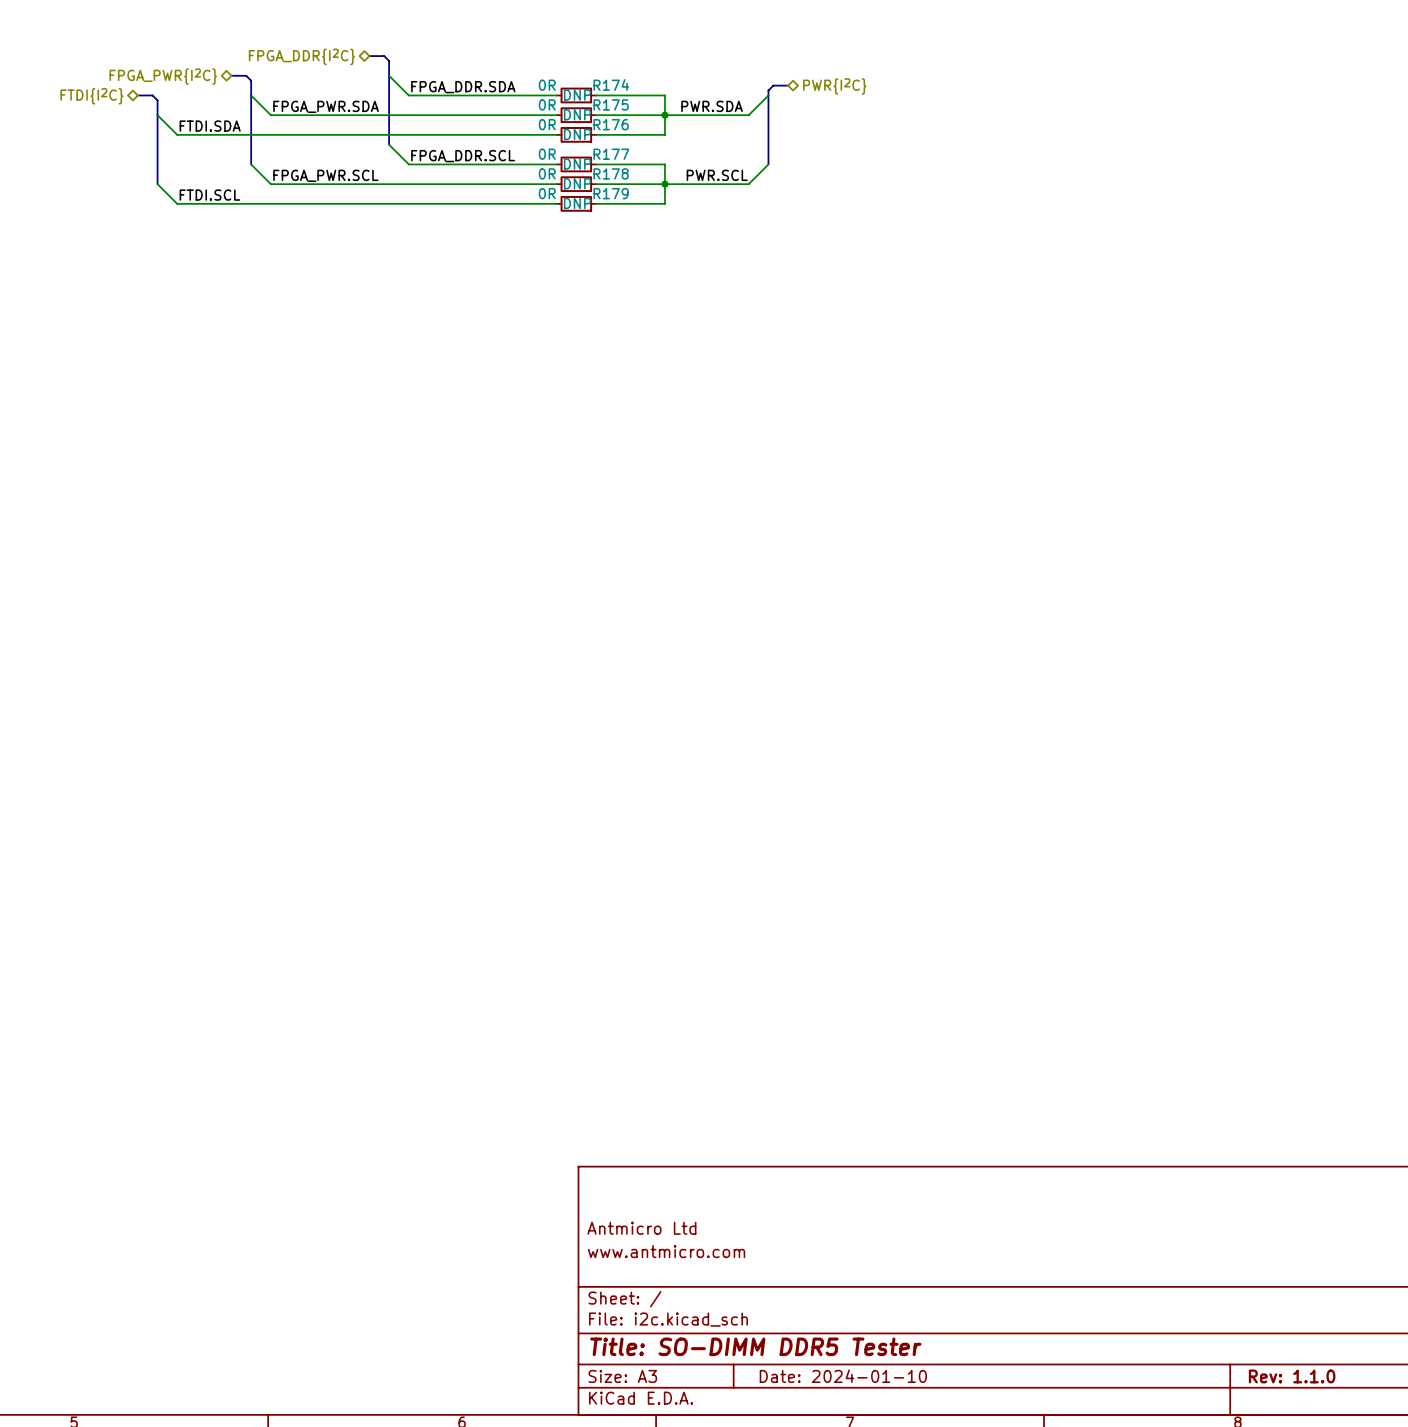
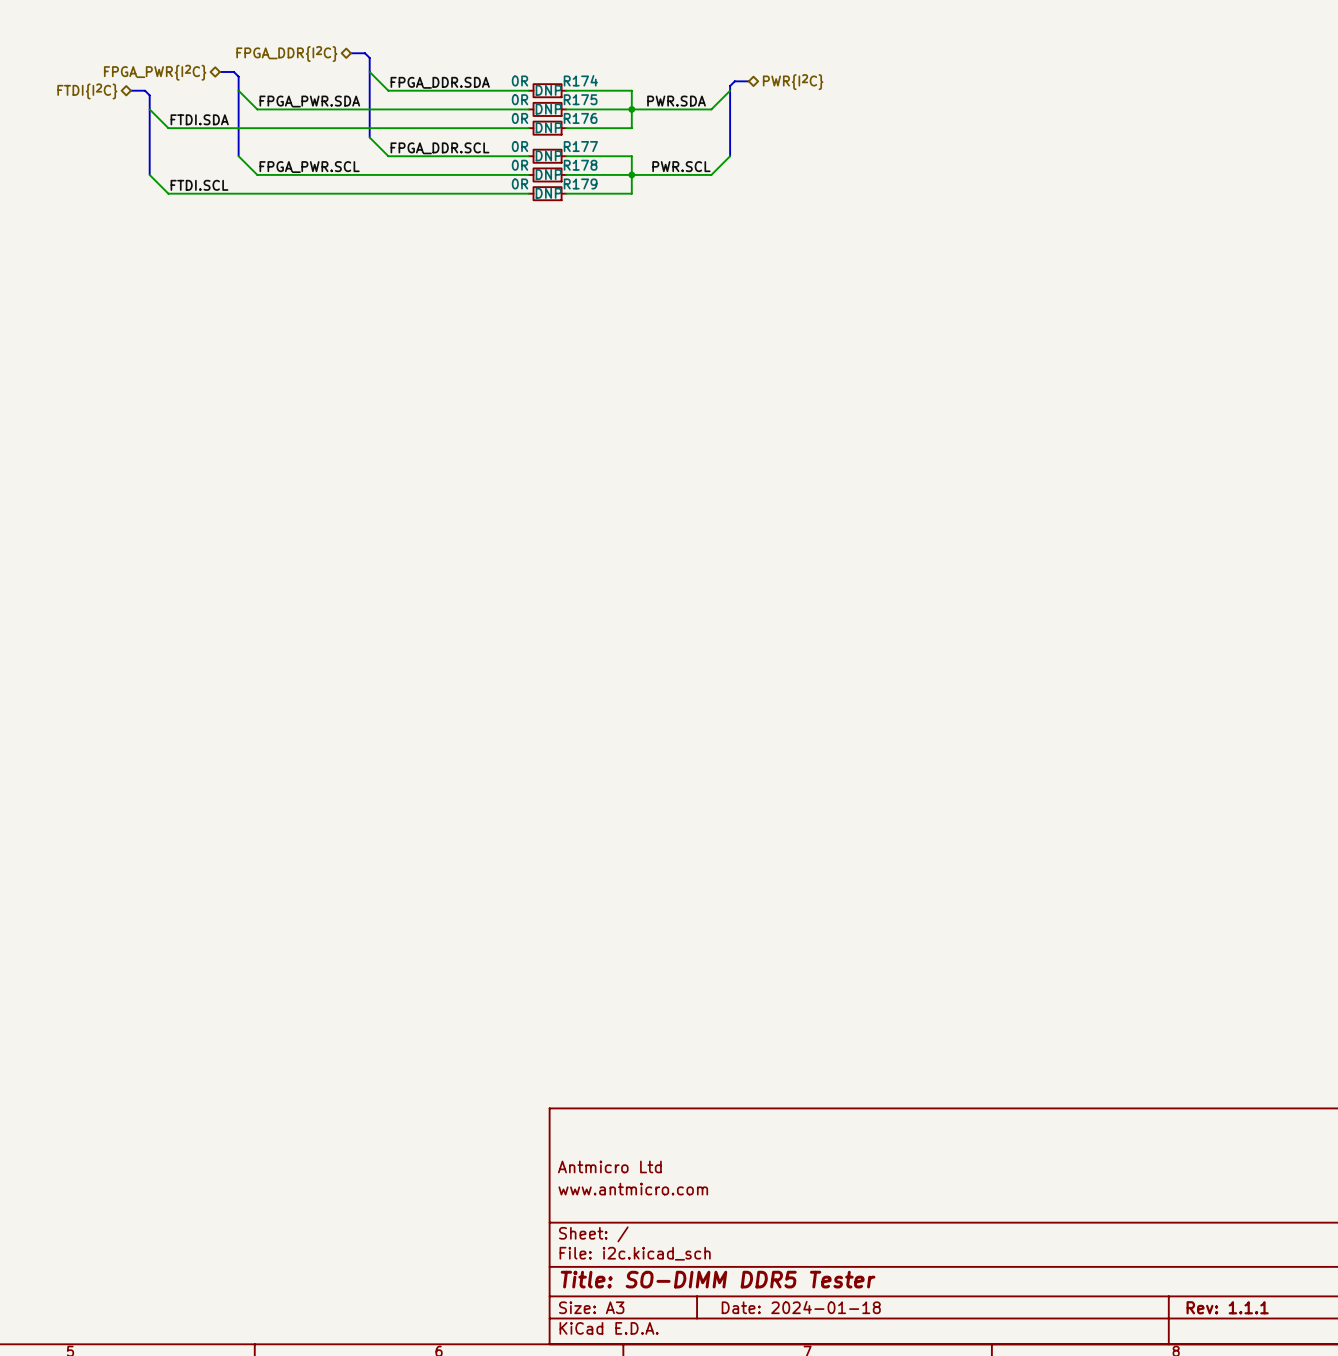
title block: Date: 2024-01-10 (843, 1376) -> Date: 2024-01-18 (801, 1307)
title block: Rev: 1.1.0 (1292, 1376) -> Rev: 1.1.1 (1227, 1307)

